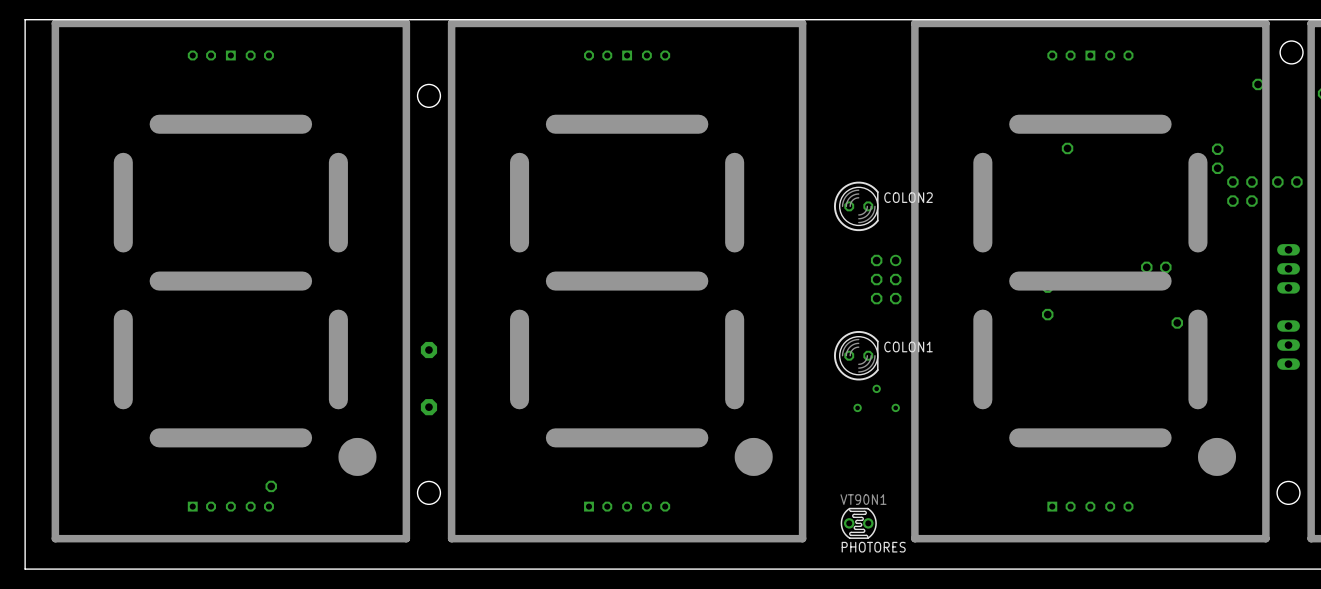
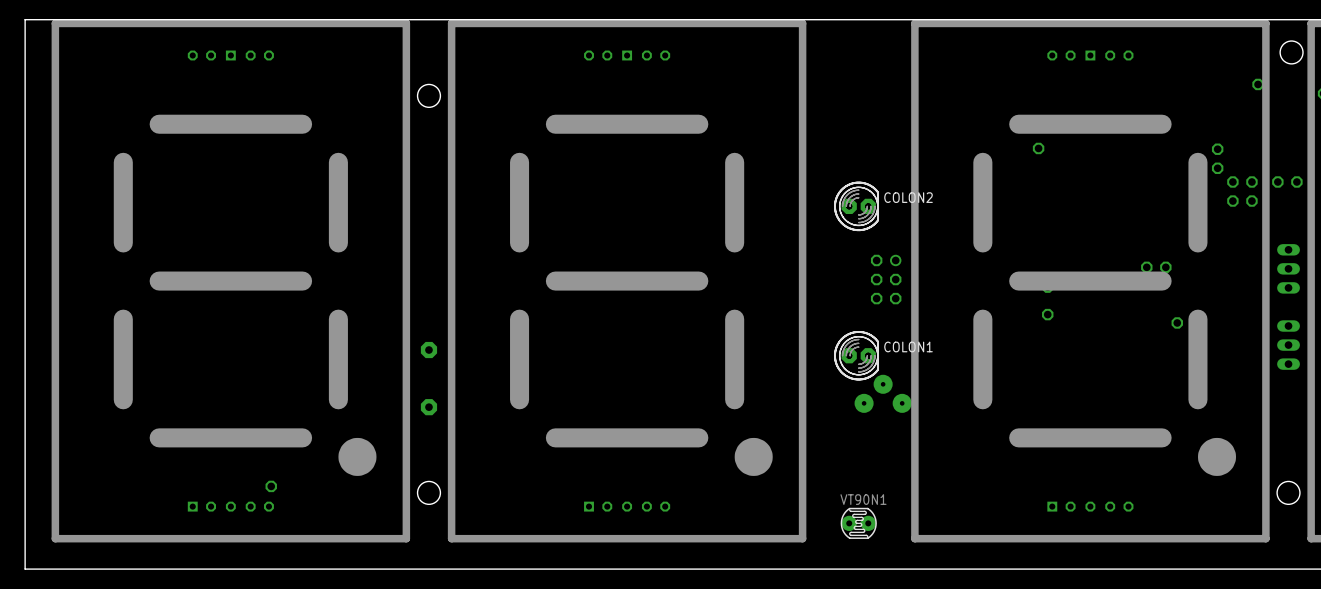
part position: (1067, 148) -> (1038, 148)
part: none -> (856, 206)
part: none -> (856, 355)
part: none -> (883, 393)
part: (876, 398) -> none
PHOTORES: VT90N1 (858, 523) -> none
part: none -> VT90N1 (858, 523)

